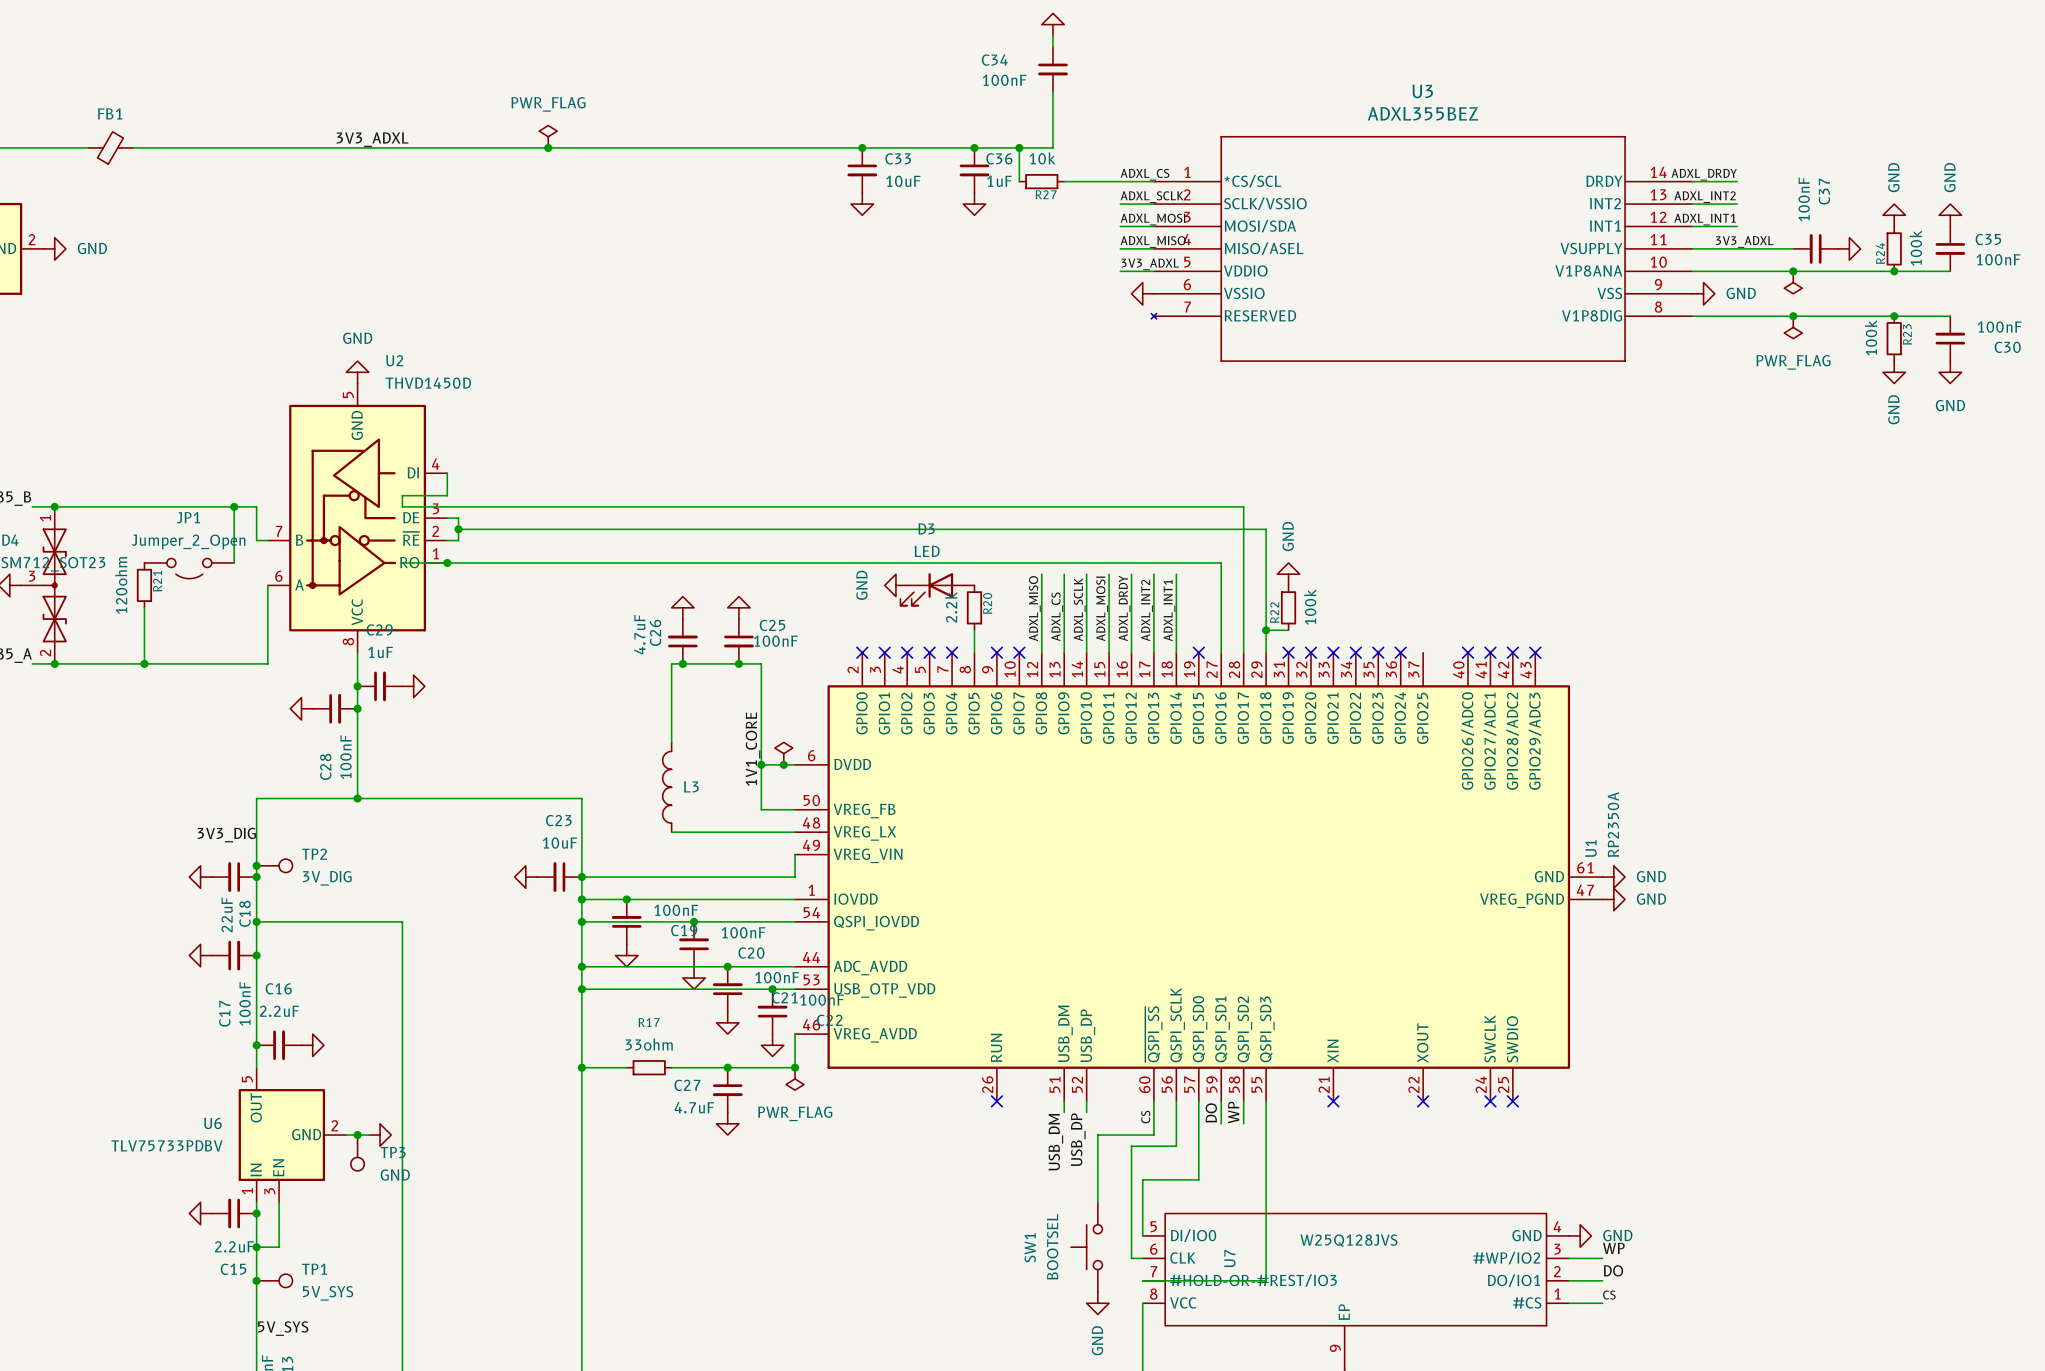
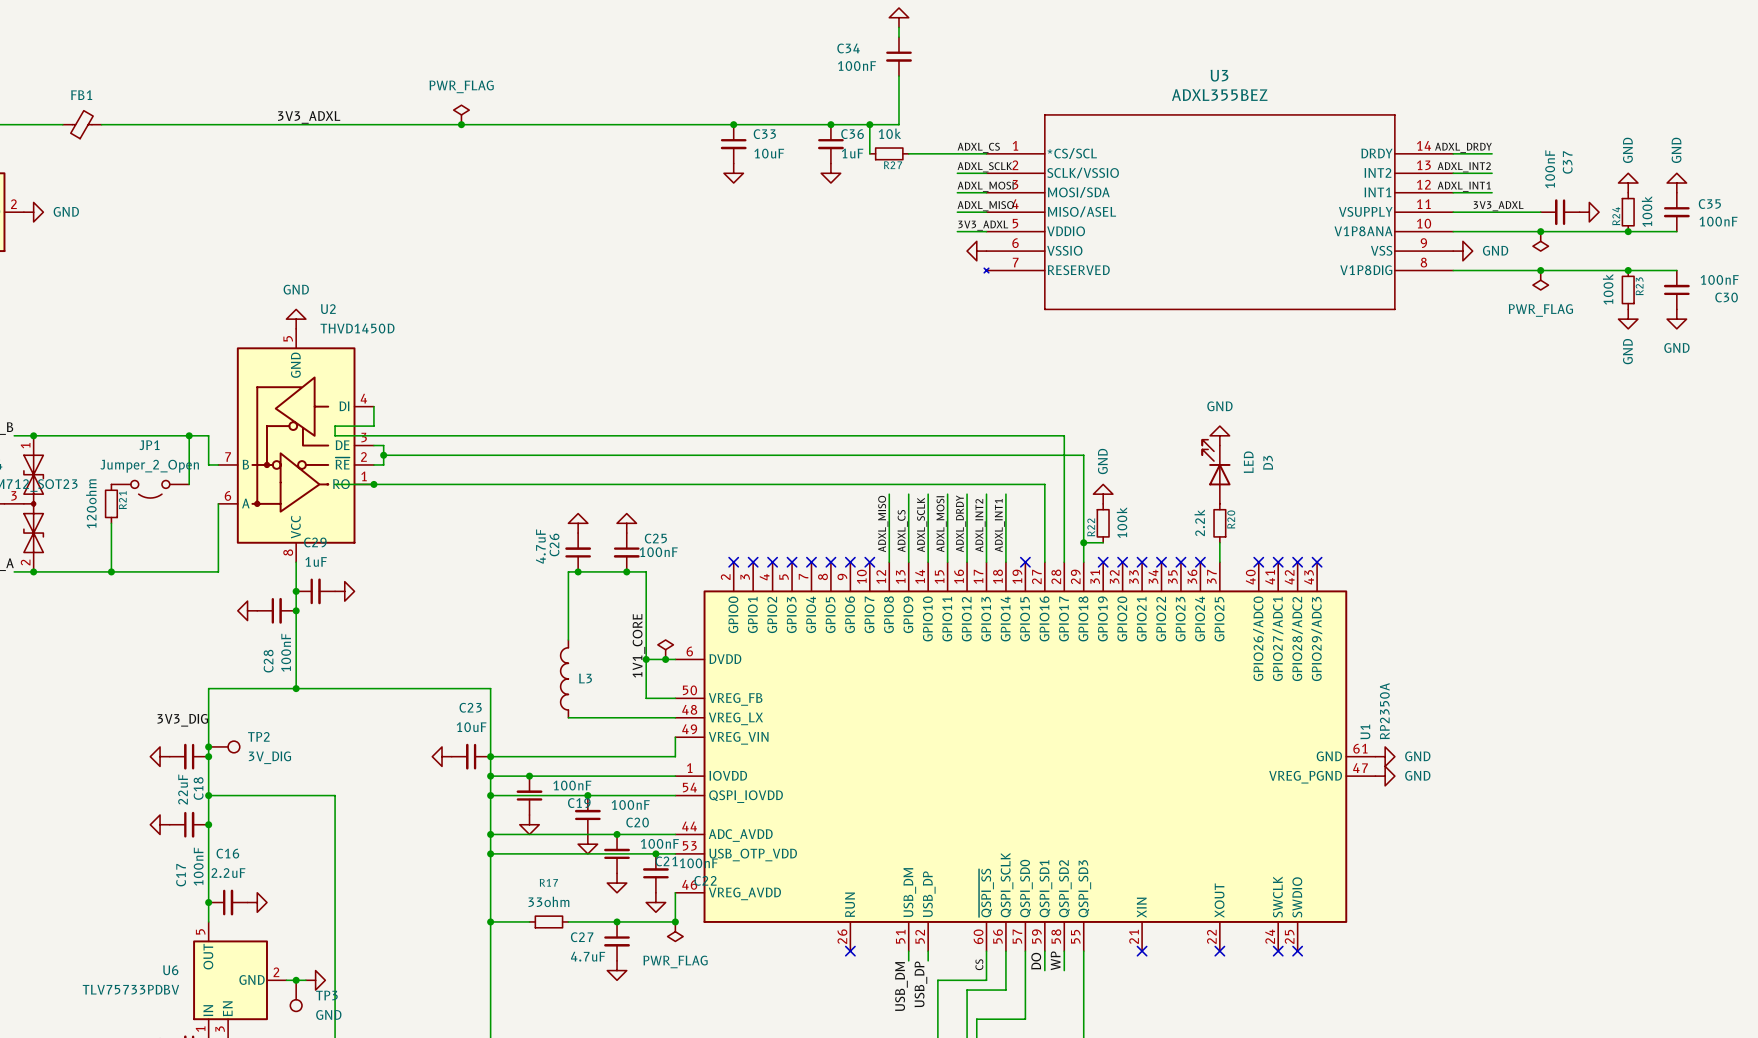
power symbol: none -> GND (1219, 435)
power symbol: GND (895, 585) -> none
D3 rotation: 0° (926, 589) -> 90° clockwise (1216, 462)
D3 position: (937, 589) -> (1216, 471)
R20 position: (974, 607) -> (1219, 523)
wire: (974, 630) (974, 652) -> none
wire: none -> (1219, 542) (1219, 562)
no-connect mark: none -> (830, 562)

